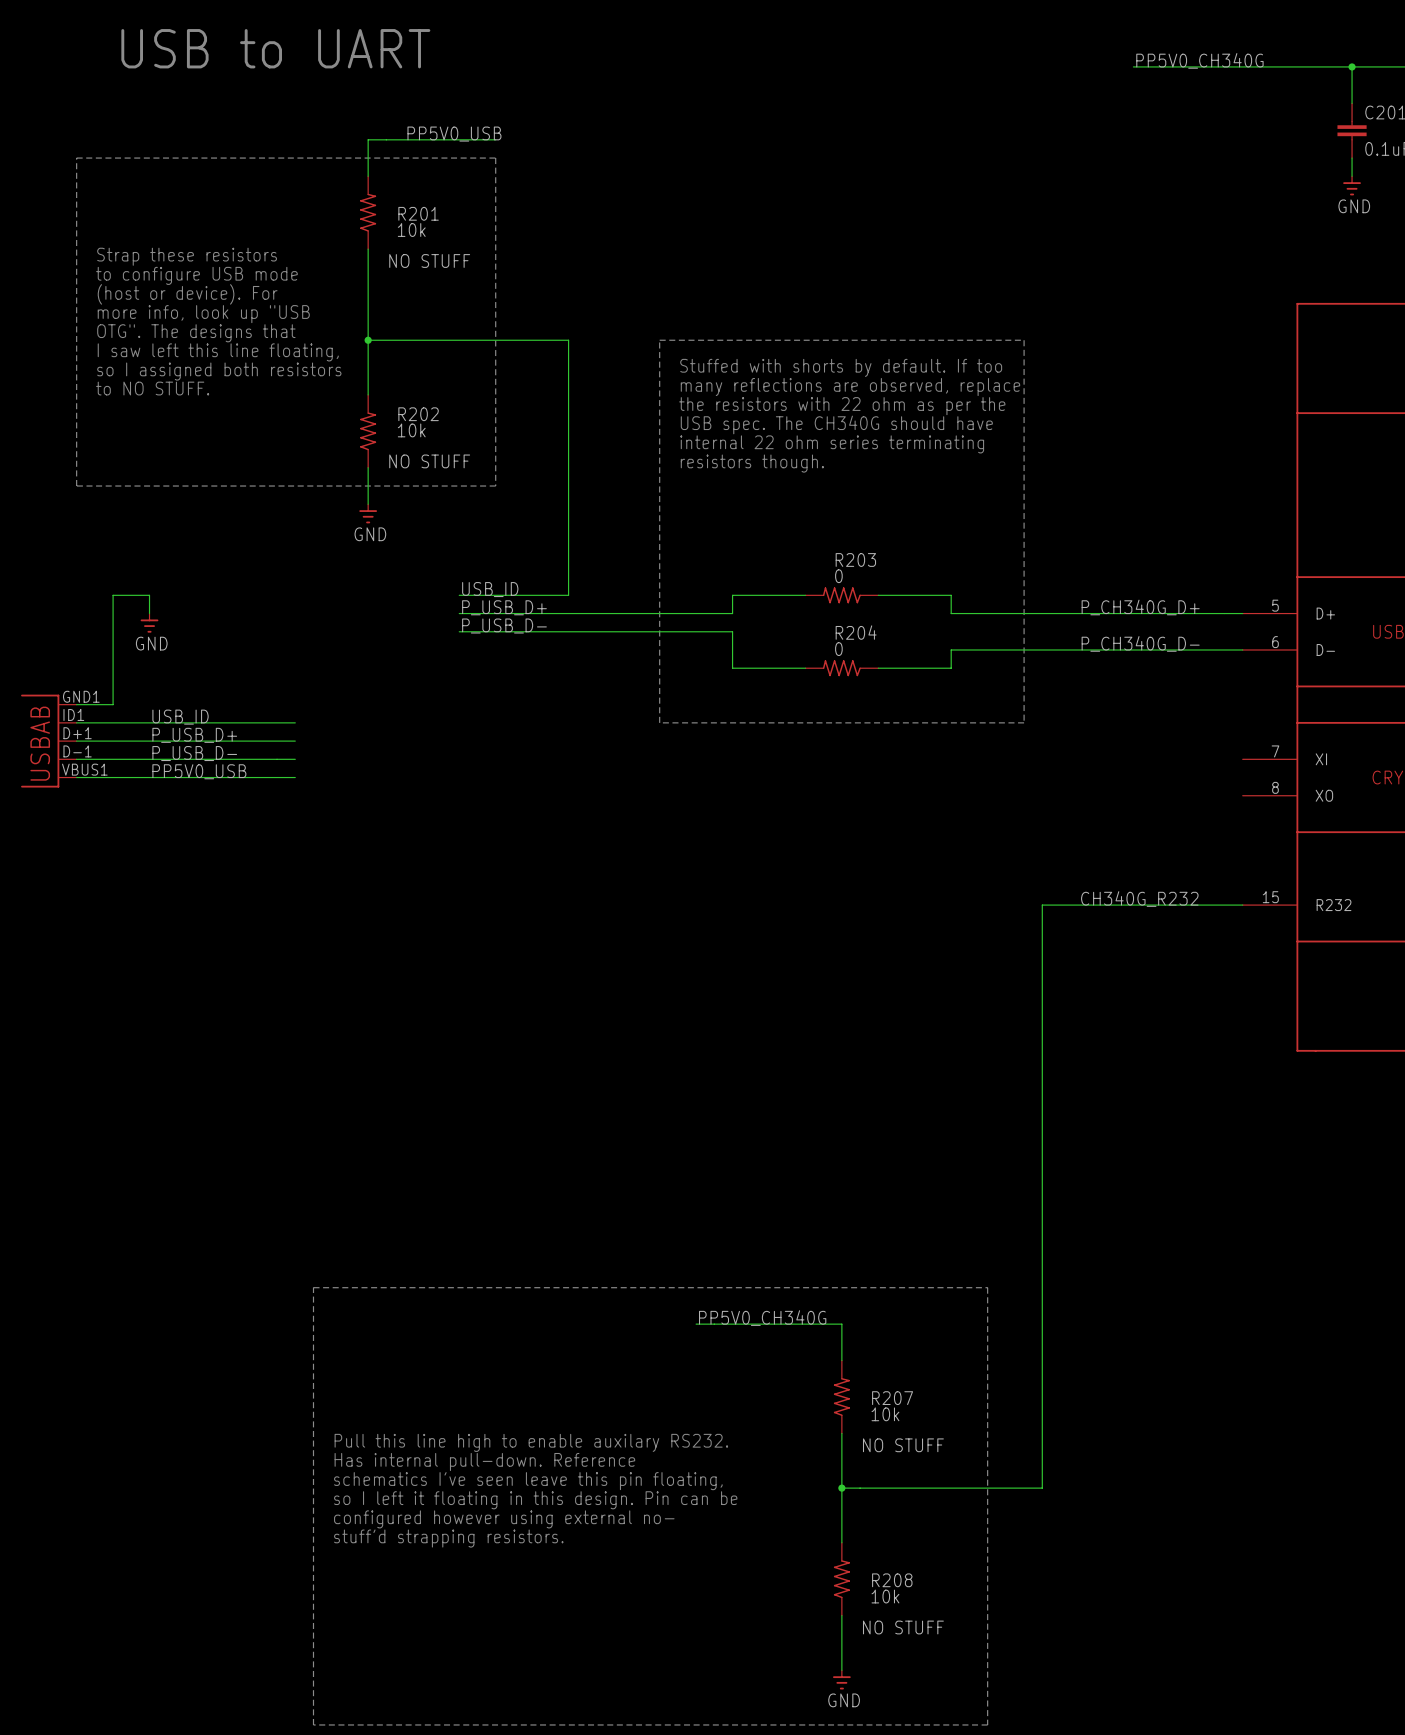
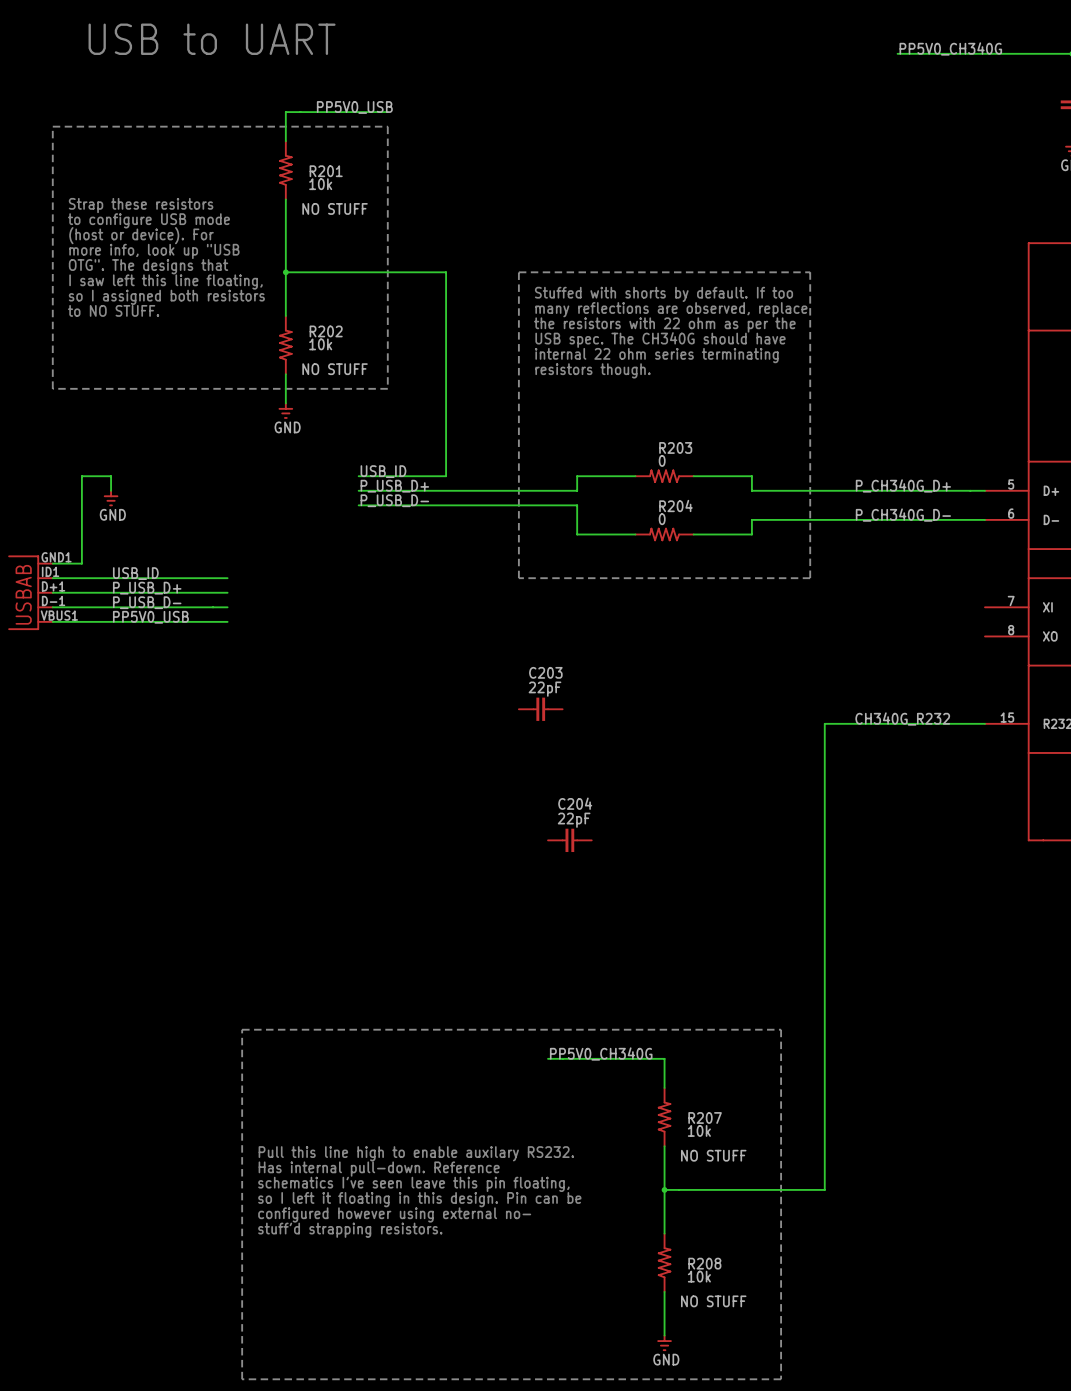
C203: none -> 22pF (540, 709)
C204: none -> 22pF (569, 840)

